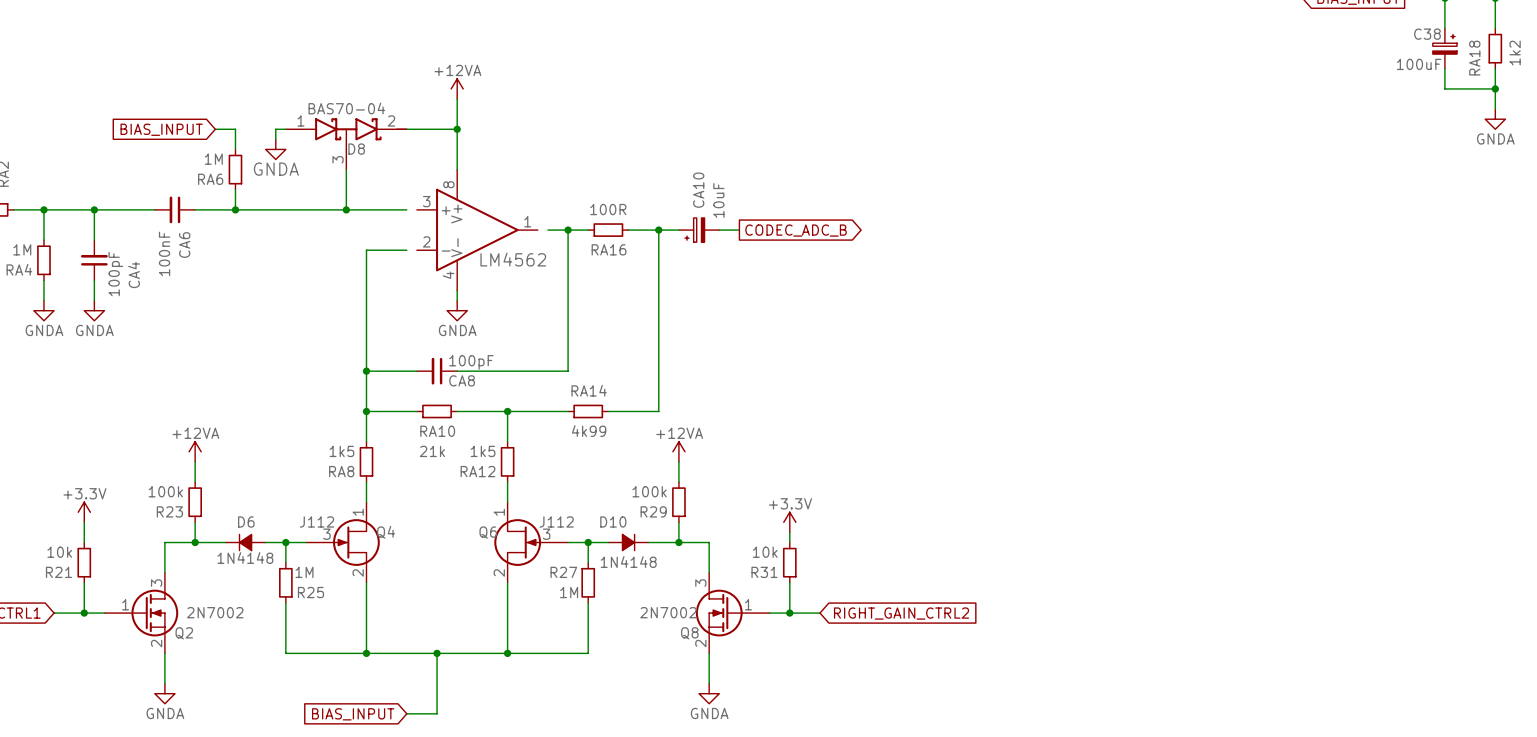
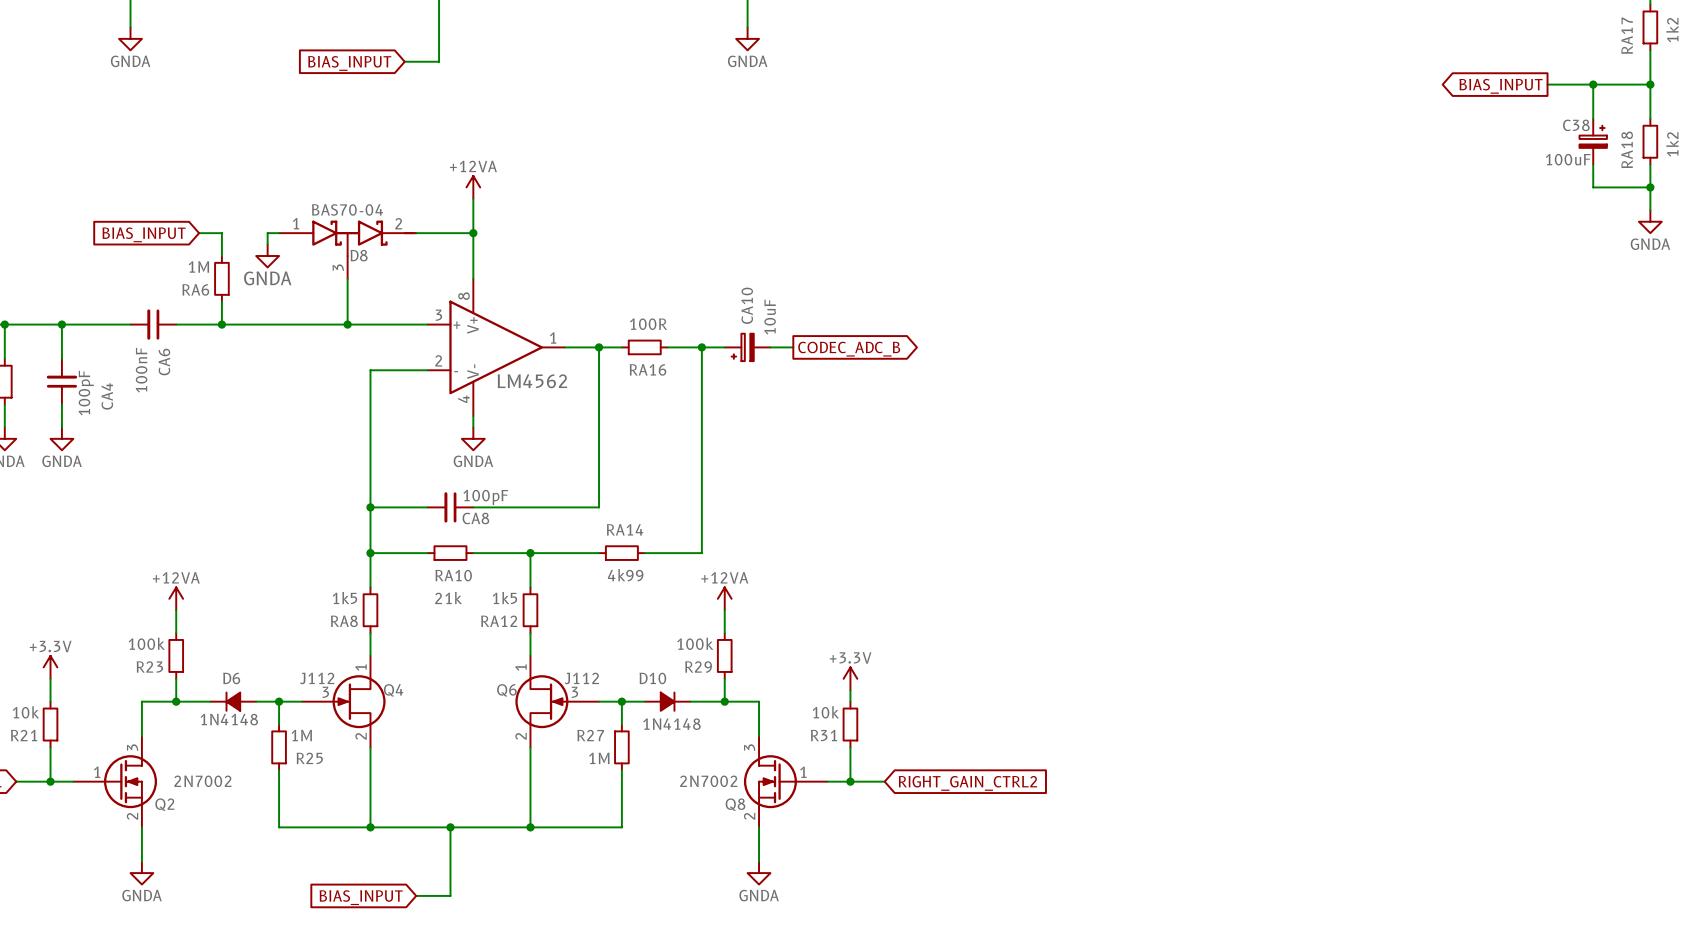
wire: none -> (416, 324) (427, 324)
wire: none -> (564, 347) (576, 347)
wire: none -> (416, 370) (427, 370)

